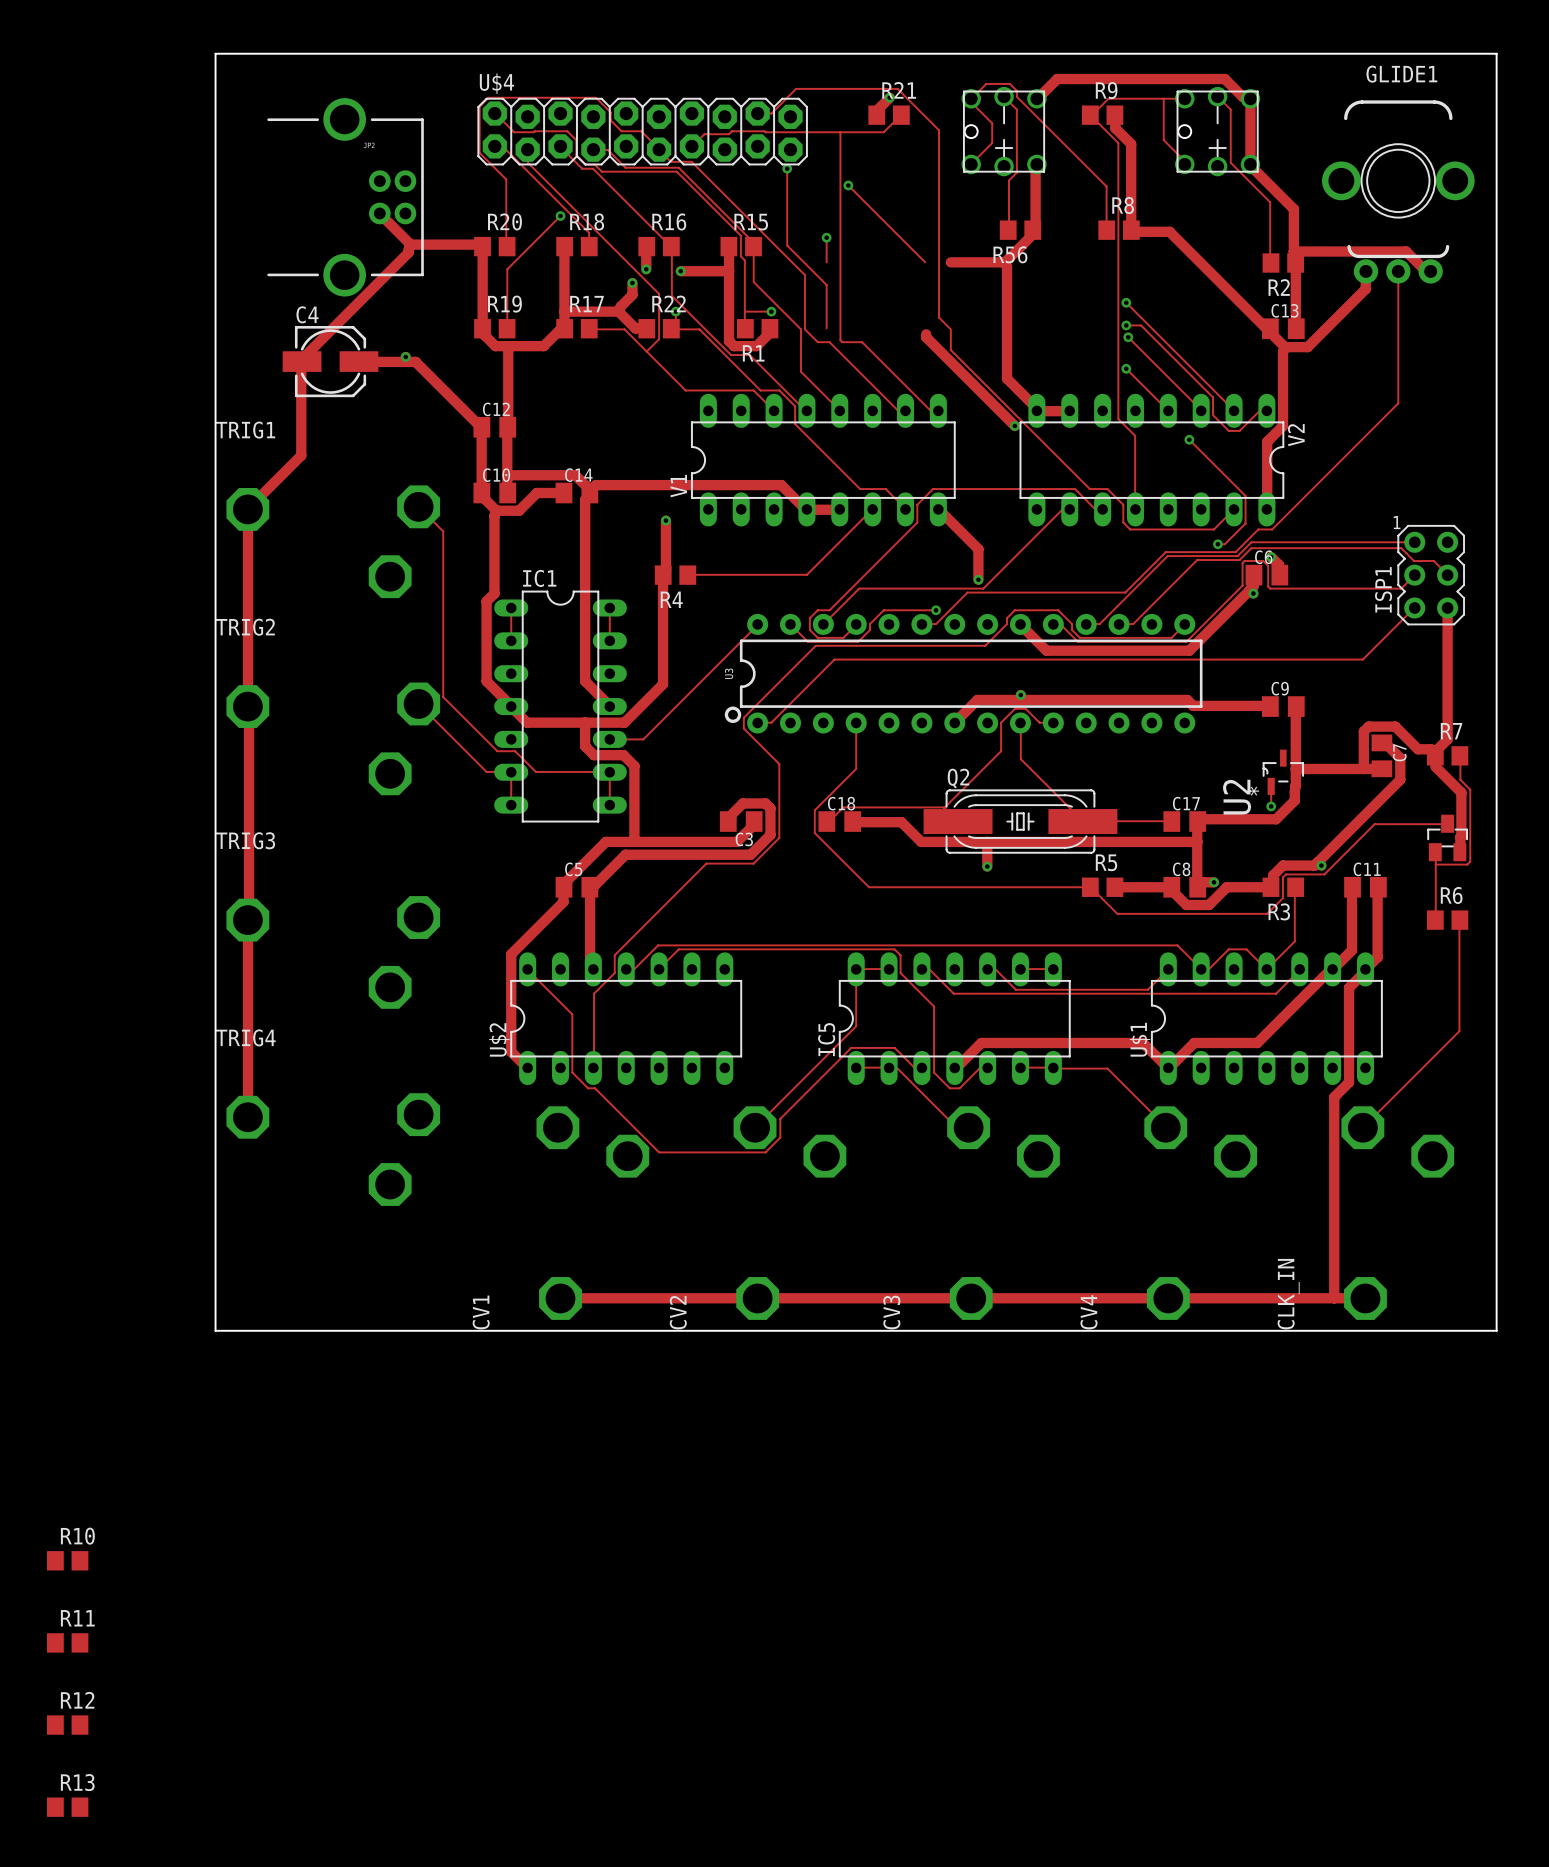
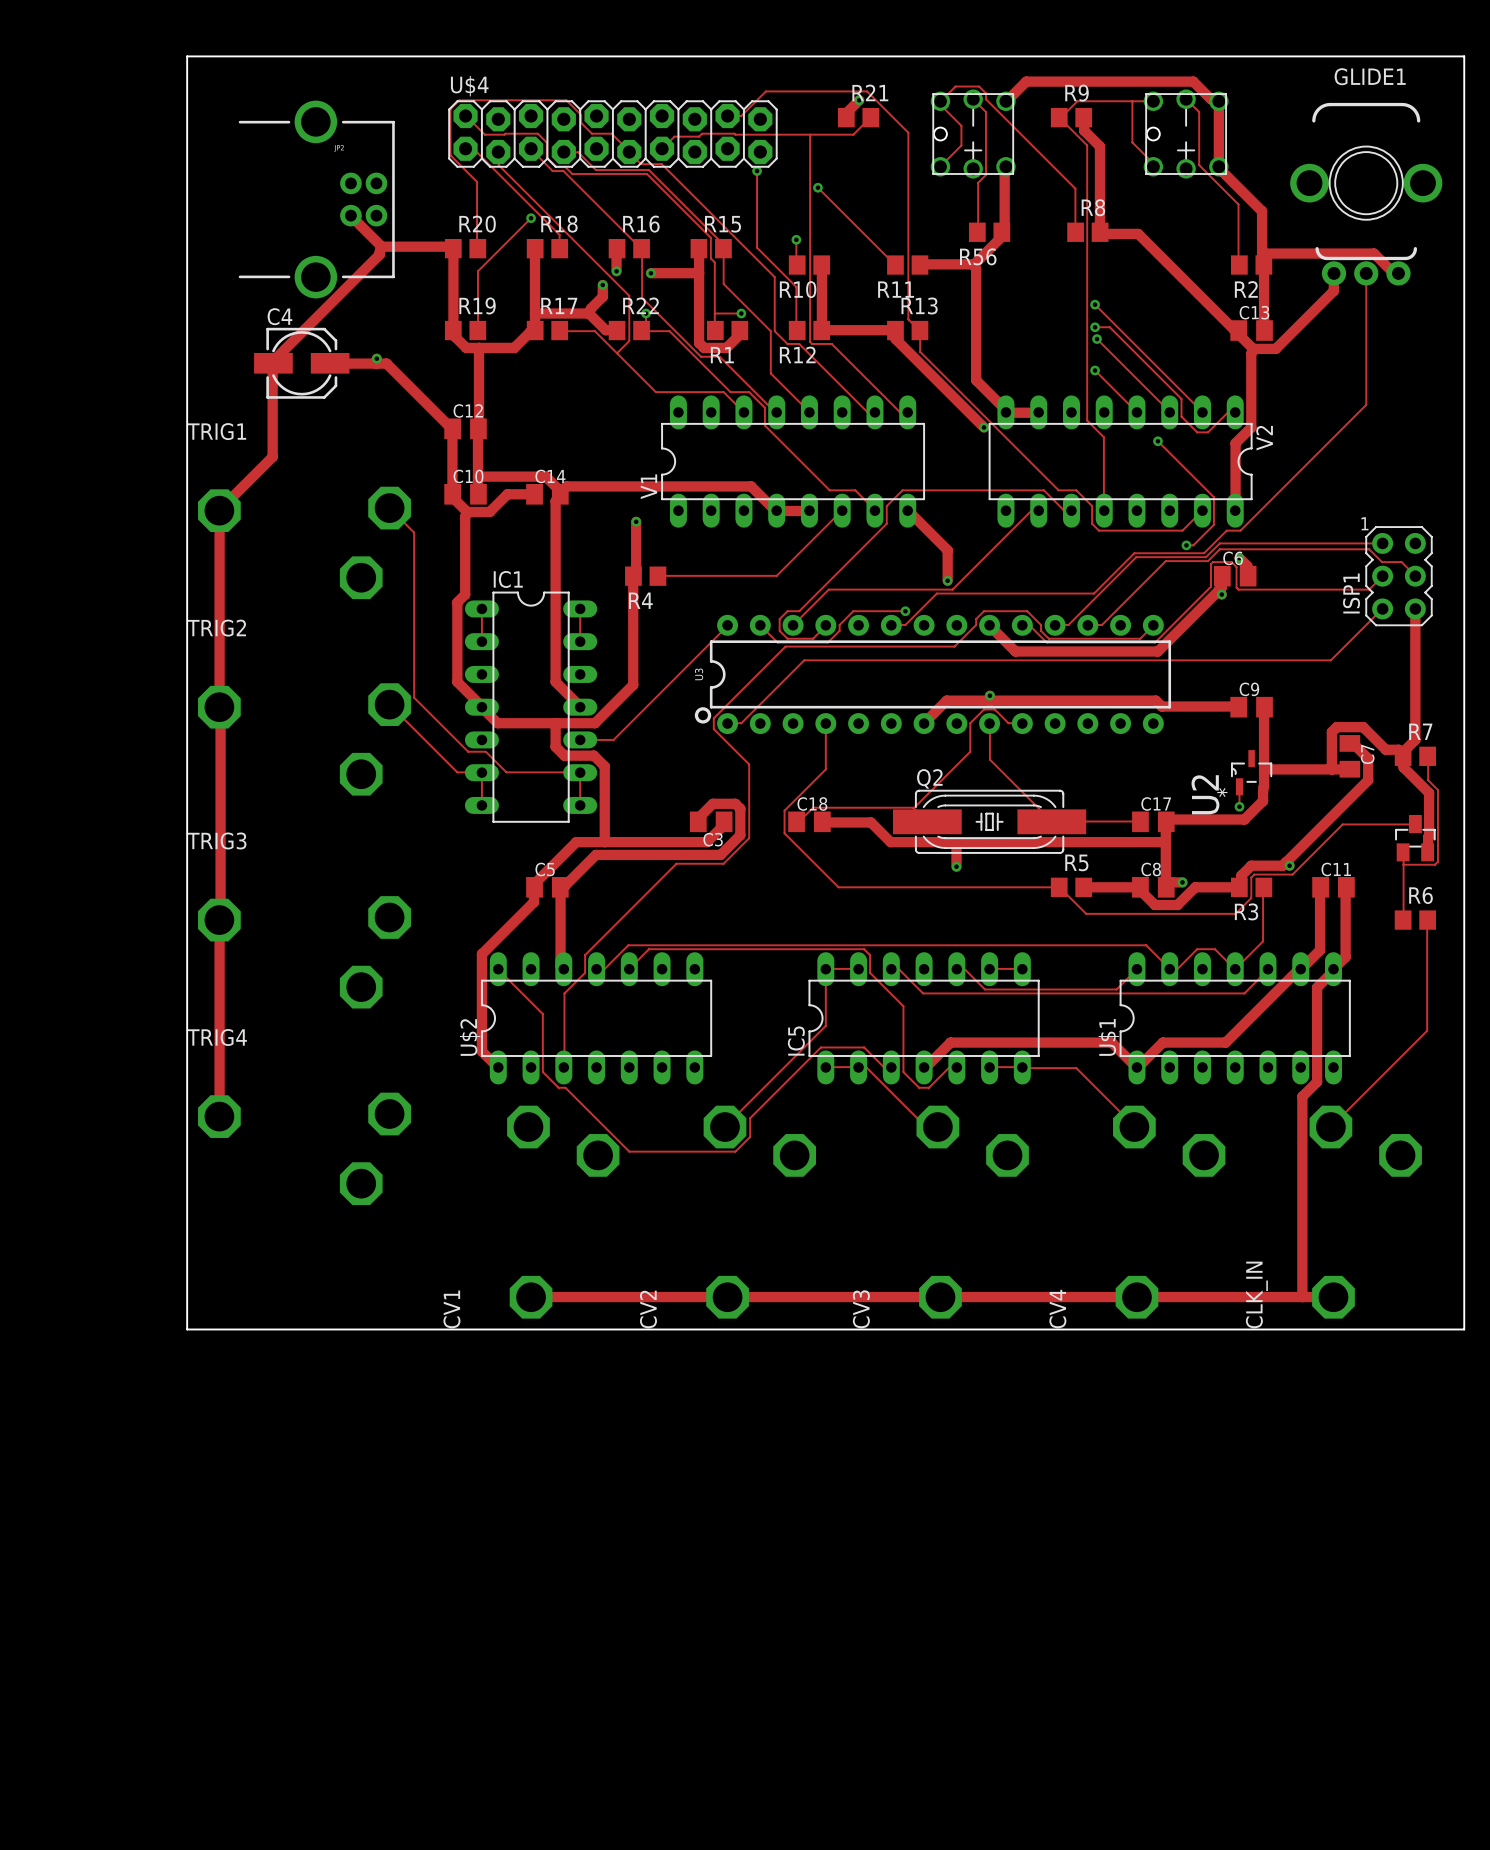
track: none -> (821, 265) (821, 330) (894, 330) (895, 336)
R10 name position: R10 (77, 1536) -> R10 (798, 289)
R10 position: (67, 1560) -> (809, 265)
R11 name position: R11 (77, 1618) -> R11 (896, 289)
R11 position: (67, 1642) -> (907, 265)
R12 name position: R12 (77, 1700) -> R12 (797, 354)
R12 position: (67, 1725) -> (809, 330)
R13 position: (67, 1807) -> (907, 330)

